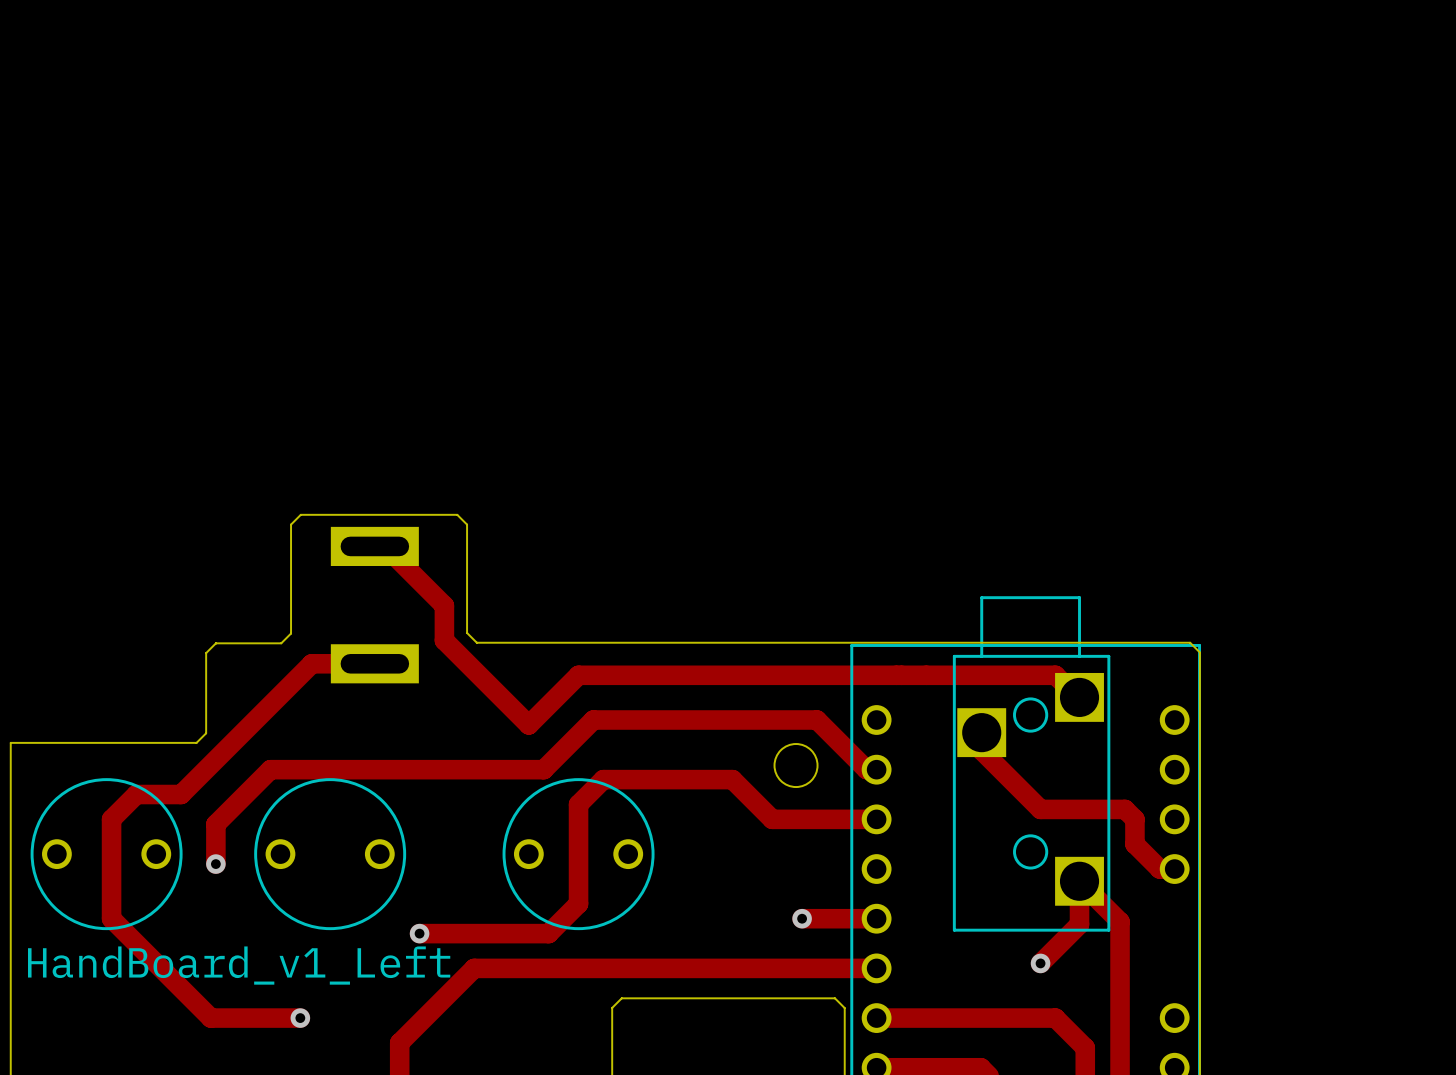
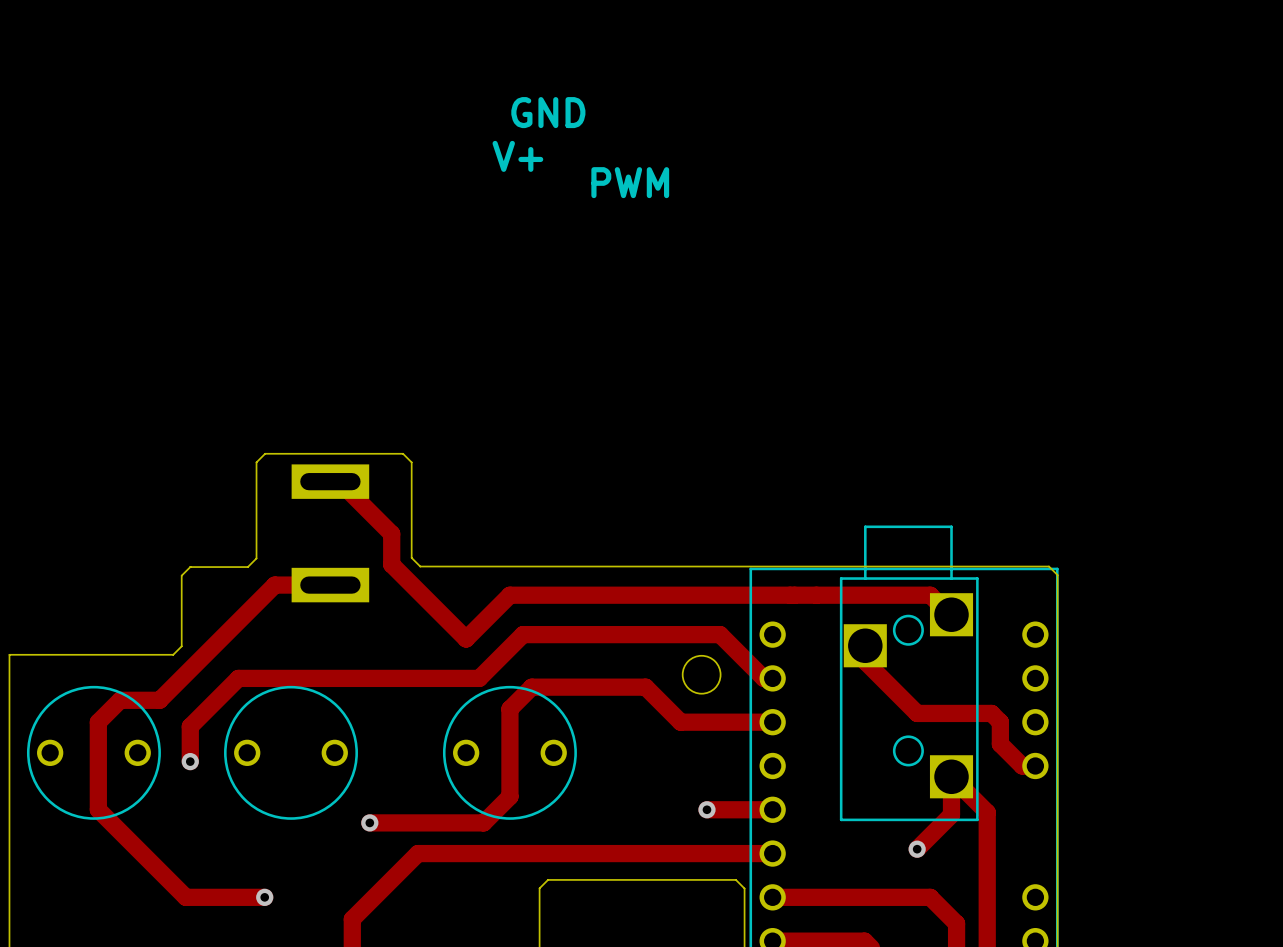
text: none -> GND (548, 112)
text: none -> V+ (517, 156)
text: none -> PWM (630, 182)
text: HandBoard_v1_Left (239, 965) -> none

